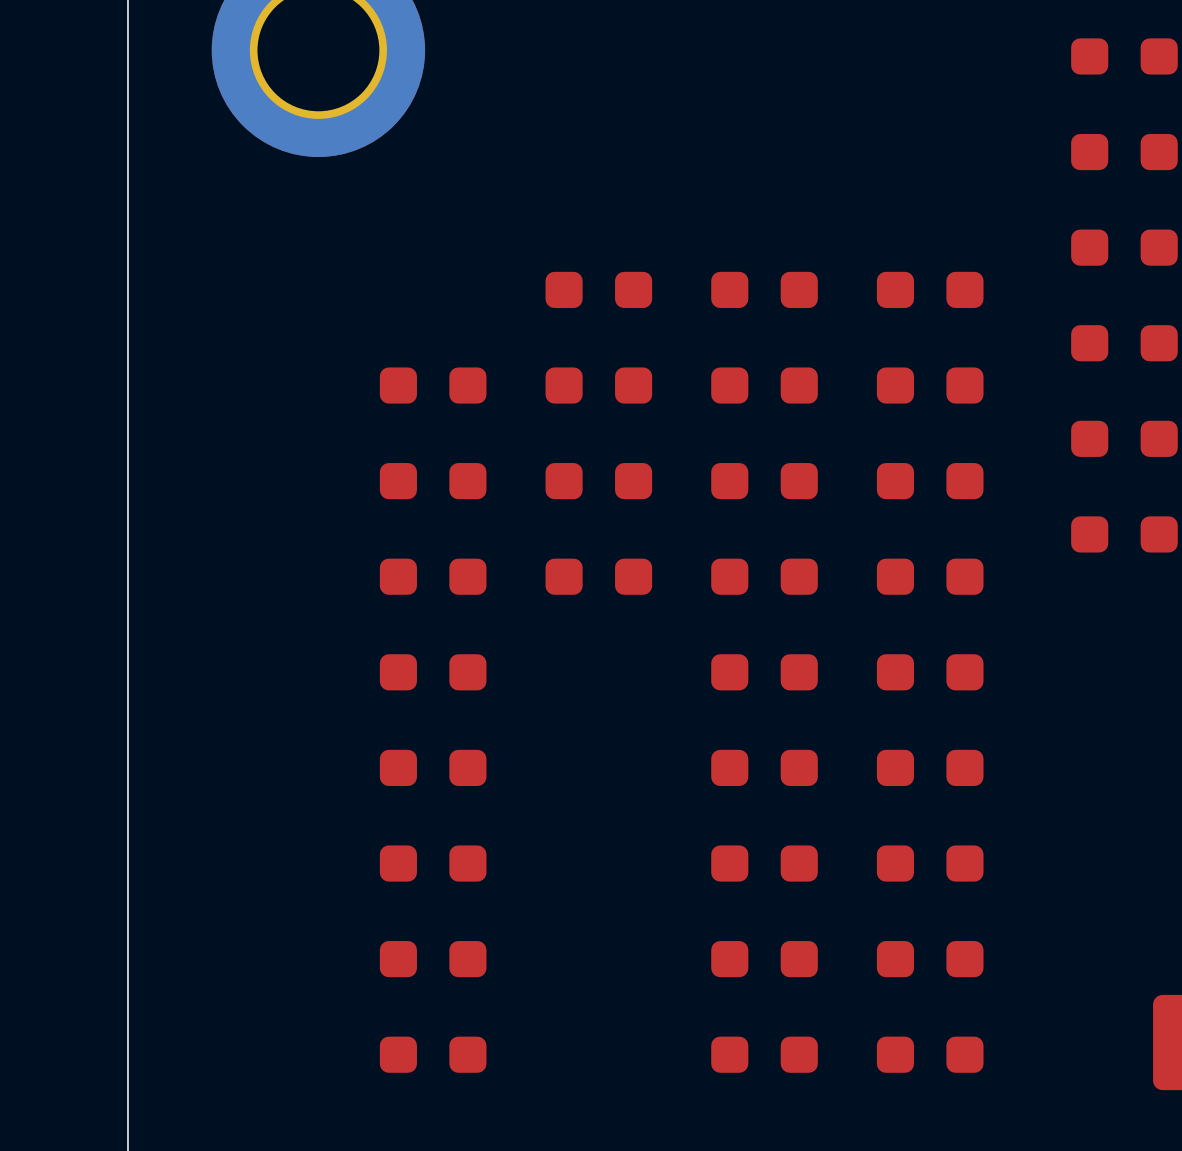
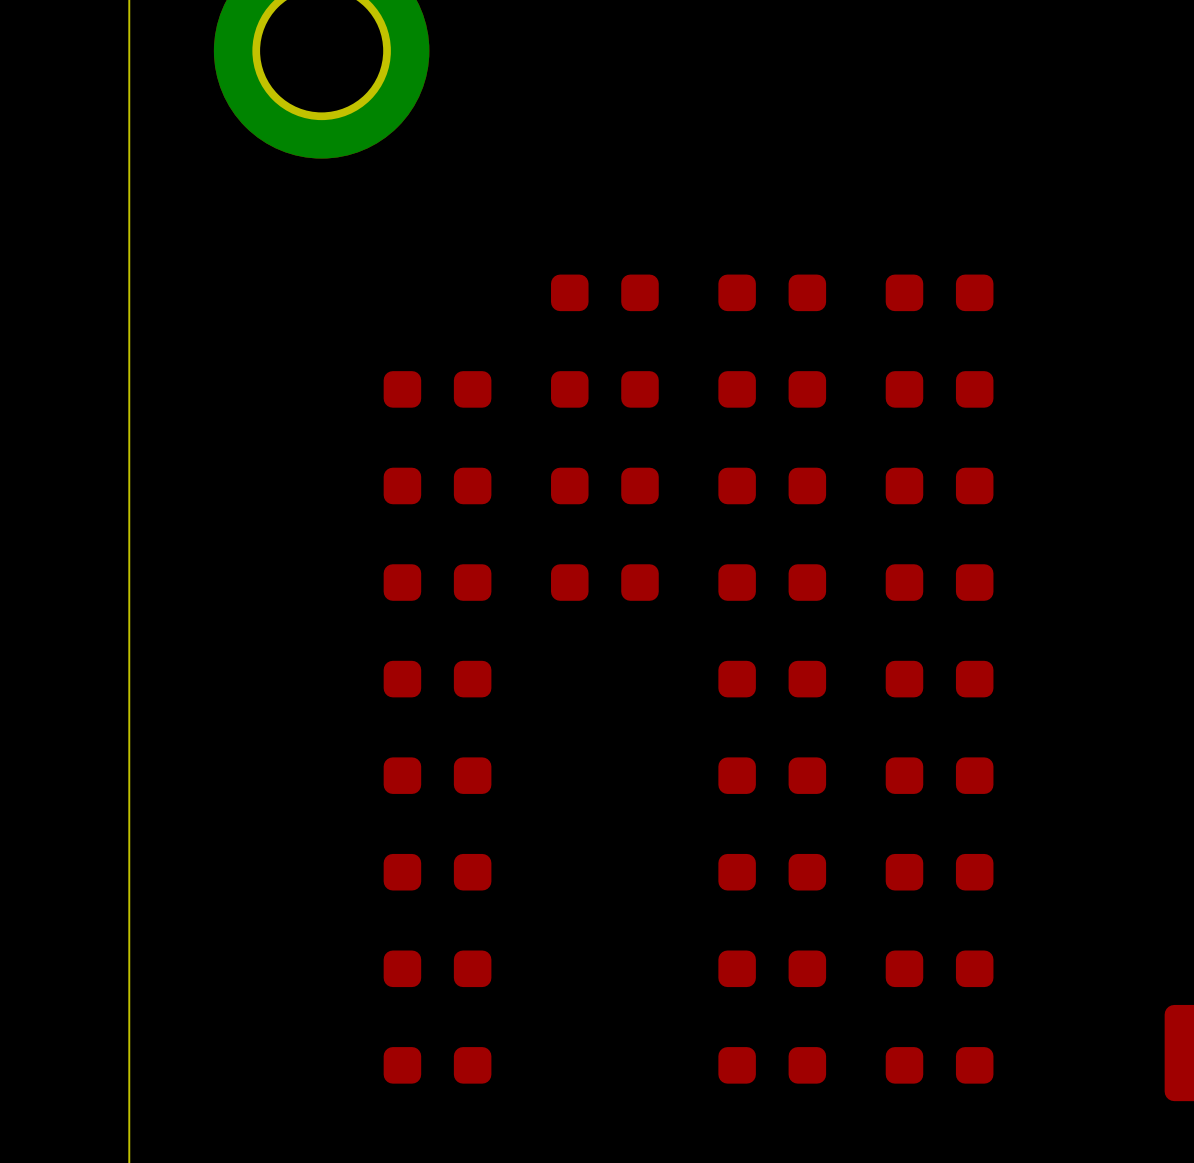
part: (1124, 56) -> none
part: (1124, 152) -> none
part: (1124, 247) -> none
part: (1124, 343) -> none
part: (1124, 438) -> none
part: (1124, 534) -> none

